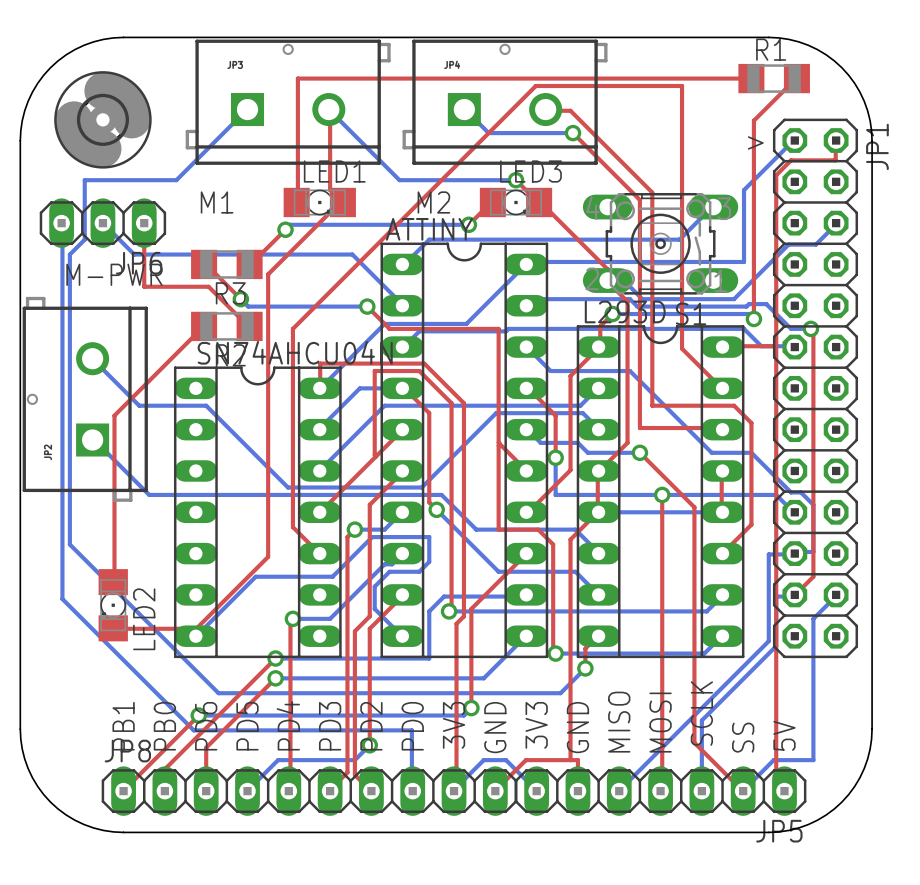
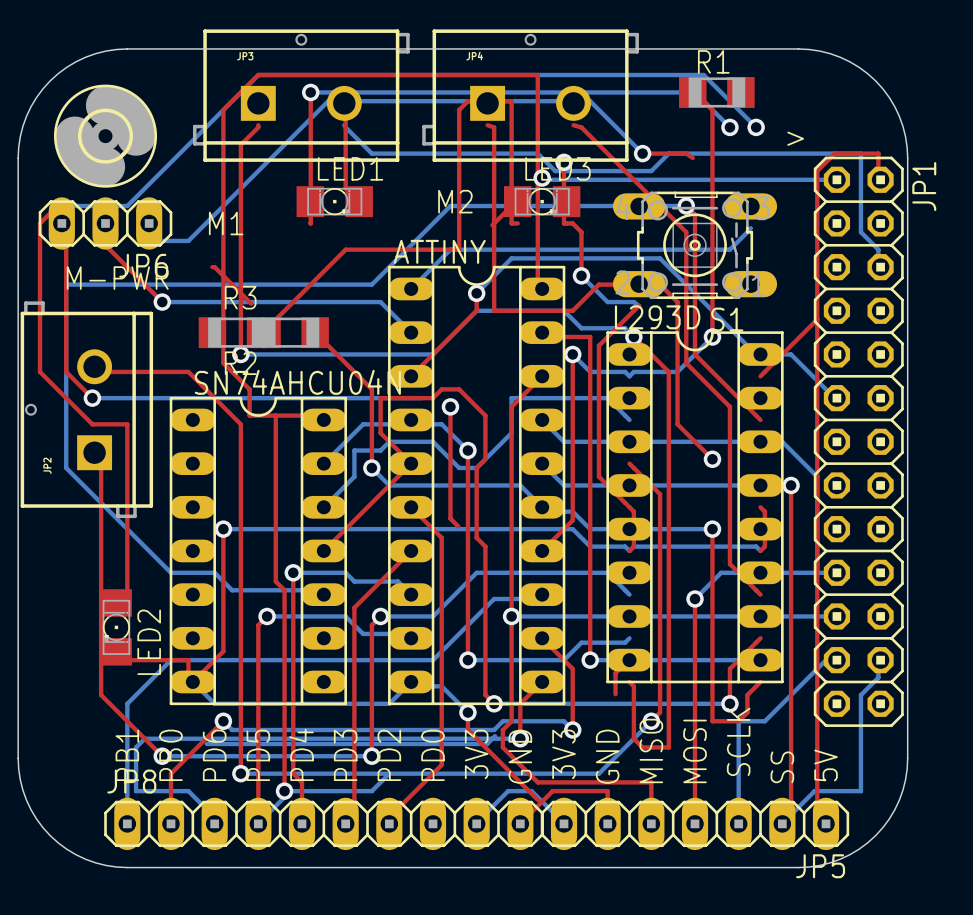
top track: (751, 78) (297, 78) (296, 202) -> none
R1 position: (774, 78) -> (716, 92)
top track: (796, 78) (753, 120) (753, 318) -> none
top track: none -> (310, 92) (310, 223)
bottom track: none -> (310, 92) (695, 92) (729, 127)
via: none -> (310, 92)
top track: none -> (692, 92) (712, 109) (712, 337)
bottom track: (247, 109) (176, 180) (84, 180) (84, 239) (69, 254) (69, 544) (218, 693) (560, 693) (585, 668) -> none
bottom track: (328, 109) (399, 180) (516, 180) -> none
bottom track: (464, 109) (488, 133) (573, 133) -> none
top track: (545, 109) (570, 110) (652, 192) (652, 231) -> (573, 125) (581, 127) (686, 232)
part position: (102, 119) -> (105, 136)
top track: none -> (258, 125) (240, 144) (240, 354)
bottom track: none -> (344, 125) (371, 153) (537, 153) (555, 171) (651, 171) (668, 153) (860, 153) (860, 232) (878, 249) (878, 267) (880, 267)
top track: none -> (487, 125) (494, 127) (494, 310) (572, 310) (598, 284) (660, 284) (677, 302) (677, 424) (712, 459)
via: none -> (729, 127)
bottom track: none -> (756, 127) (703, 75) (258, 75) (127, 206) (57, 206)
via: none -> (756, 127)
top track: (573, 133) (639, 200) (639, 428) (721, 428) (722, 429) -> none
via: (573, 133) -> none
bottom track: (794, 140) (744, 190) (744, 261) (530, 261) (525, 264) (466, 323) (384, 323) (320, 388) -> (92, 398) (334, 398)
top track: (836, 140) (835, 160) (791, 160) (776, 175) -> (880, 179) (878, 179) (878, 153) (834, 153) (817, 172)
top track: none -> (642, 153) (686, 153) (692, 157)
bottom track: none -> (642, 153) (590, 101) (328, 101) (188, 240) (153, 240) (149, 245)
via: none -> (642, 153)
board edge: (20, 161) (20, 130) (24, 110) (32, 92) (43, 75) (58, 60) (74, 49) (93, 41) (113, 37) (768, 37) (788, 39) (808, 45) (826, 54) (841, 67) (854, 83) (864, 101) (870, 120) (872, 140) (871, 739) (867, 759) (859, 777) (848, 794) (834, 808) (817, 820) (798, 827) (778, 831) (758, 832) -> (18, 158) (22, 126) (31, 106) (42, 88) (58, 73) (75, 61) (95, 53) (116, 49) (798, 48) (819, 51) (840, 57) (859, 67) (875, 80) (889, 97) (899, 116) (905, 136) (907, 158) (907, 769) (902, 790) (894, 809) (882, 827) (867, 842) (849, 854) (830, 862) (798, 867)
top track: none -> (564, 162) (564, 223) (572, 223) (581, 232) (581, 275)
via: none -> (564, 162)
top track: (516, 180) (607, 269) (607, 281) (627, 301) (627, 442) (598, 470) (597, 512) (570, 539) (570, 760) -> none
bottom track: none -> (537, 179) (836, 179)
text position: M1 (217, 202) -> M1 (226, 223)
top track: (342, 202) (340, 202) (268, 274) (268, 556) (193, 631) (195, 636) (193, 636) (193, 628) (113, 628) -> none
top track: none -> (57, 206) (40, 223) (40, 371) (92, 424) (127, 424) (127, 602)
top track: none -> (686, 206) (695, 214) (695, 354) (760, 419)
bottom track: none -> (686, 206) (450, 206) (371, 284) (66, 284) (66, 468) (171, 572) (214, 572) (232, 590) (319, 590) (323, 594)
via: none -> (686, 206)
bottom track: (713, 207) (679, 239) (429, 239) (402, 264) -> none
bottom track: (61, 223) (62, 599) (193, 730) (411, 730) (412, 791) -> none
bottom track: (102, 223) (134, 254) (352, 254) (402, 305) -> none
top track: (144, 223) (144, 286) (208, 286) (249, 326) -> none
top track: none -> (517, 223) (511, 223) (511, 101) (467, 101) (459, 109) (459, 249) (345, 249) (267, 328) (267, 332)
bottom track: (836, 223) (815, 244) (788, 244) (734, 299) (642, 299) (625, 281) (607, 280) -> none
bottom track: (468, 224) (290, 224) (285, 229) -> none
via: (468, 224) -> none
bottom track: none -> (750, 228) (729, 249) (450, 249) (411, 288)
top track: (285, 229) (249, 264) -> none
via: (285, 229) -> none
top track: none -> (61, 245) (66, 249) (66, 371) (92, 398)
top track: none -> (105, 245) (162, 302)
R3 position: (226, 264) -> (291, 332)
bottom track: none -> (581, 275) (607, 302) (633, 302) (639, 306)
via: none -> (581, 275)
top track: none -> (542, 288) (537, 284) (537, 75) (258, 75) (223, 109) (223, 363) (249, 389) (249, 415) (319, 415) (323, 419)
top track: none -> (476, 293) (476, 310) (411, 376)
bottom track: none -> (476, 293) (511, 258) (660, 258) (756, 354) (791, 354) (834, 398) (836, 398)
via: none -> (476, 293)
bottom track: none -> (162, 302) (380, 302) (411, 332)
via: none -> (162, 302)
bottom track: (240, 299) (248, 306) (367, 306) -> none
via: (240, 299) -> none
top track: none -> (639, 306) (598, 345) (598, 476) (633, 511) (633, 546) (629, 550)
bottom track: (526, 305) (533, 299) (630, 299) (637, 306) (746, 306) (748, 304) (766, 304) (791, 328) (810, 328) -> none
top track: (367, 306) (389, 328) (498, 328) (498, 442) (526, 470) -> none
via: (367, 306) -> none
top track: (612, 314) (600, 326) (600, 346) (570, 375) (570, 470) (526, 512) -> none
bottom track: (612, 314) (748, 314) (753, 318) -> none
via position: (612, 314) -> (633, 337)
top track: none -> (817, 319) (760, 376)
via: (753, 318) -> none
top track: (204, 326) (114, 415) (113, 582) -> none
top track: none -> (315, 332) (371, 389) (371, 468)
top track: none -> (542, 332) (546, 337) (590, 337) (590, 660)
top track: (810, 328) (813, 331) (813, 576) (794, 594) -> none
via: (810, 328) -> none
top track: none -> (633, 337) (668, 371) (668, 747) (642, 747) (633, 738) (633, 686) (629, 681)
bottom track: none -> (633, 337) (625, 328) (581, 328) (564, 310) (476, 310) (433, 354) (240, 354)
bottom track: none -> (712, 337) (677, 371) (633, 371) (629, 376) (625, 371) (590, 371) (572, 354)
via: none -> (712, 337)
top track: (776, 346) (722, 347) -> none
via: none -> (240, 354)
bottom track: (402, 347) (419, 331) (506, 331) (508, 328) (744, 328) (761, 346) (794, 347) -> none
bottom track: (526, 347) (550, 371) (630, 371) (711, 452) (751, 452) (791, 492) (801, 492) (813, 504) (813, 551) (768, 554) (768, 641) (619, 791) -> none
top track: none -> (572, 354) (572, 520) (542, 550)
via: none -> (572, 354)
top track: (652, 355) (652, 405) (734, 405) (751, 423) (751, 470) -> (686, 363) (729, 406) (729, 564) (760, 594)
top track: none -> (94, 366) (101, 371) (188, 371) (240, 424) (240, 773)
bottom track: (92, 358) (139, 405) (206, 405) (287, 487) (421, 487) (496, 413) (582, 413) (598, 429) -> none
top track: none -> (542, 376) (511, 406) (511, 721) (502, 730) (502, 747) (537, 782) (651, 782) (651, 823)
via: none -> (92, 398)
top track: (319, 388) (320, 363) (424, 363) (463, 403) (463, 616) (456, 623) (456, 787) (454, 791) -> none
bottom track: (359, 388) (319, 429) -> (377, 398) (335, 398)
top track: none -> (422, 398) (380, 398) (380, 433) (411, 463) (323, 550)
top track: (404, 388) (429, 413) -> (450, 406) (450, 424)
top track: none -> (424, 398) (433, 398) (441, 389) (459, 389) (485, 415) (485, 459) (476, 468) (476, 537) (485, 546) (485, 695) (494, 703)
top track: (526, 388) (555, 415) (555, 457) -> none
bottom track: (598, 388) (580, 405) (384, 405) (319, 470) -> none
top track: (722, 388) (682, 348) (682, 86) (535, 86) (292, 328) (292, 527) (319, 553) -> none
JP1 position: (815, 388) -> (858, 441)
via: none -> (450, 406)
top track: none -> (275, 415) (275, 581) (284, 590) (284, 791)
bottom track: none -> (542, 419) (564, 441) (782, 441) (817, 476) (817, 572)
bottom track: none -> (629, 419) (607, 398) (511, 398) (511, 433) (476, 468) (459, 468) (433, 441) (389, 441) (380, 450) (354, 450) (354, 476) (323, 507)
top track: (402, 429) (319, 512) -> none
bottom track: (526, 429) (540, 442) (577, 442) (587, 452) (639, 452) -> none
top track: none -> (467, 450) (467, 660)
bottom track: none -> (467, 450) (441, 424) (415, 424) (411, 419) (406, 424) (363, 424) (323, 463)
via: none -> (467, 450)
top track: none -> (94, 452) (101, 459) (101, 695) (162, 756)
bottom track: (92, 440) (149, 494) (441, 494) (476, 529) (575, 529) (598, 553) -> none
top track: (499, 444) (498, 529) (538, 529) (553, 544) (553, 651) (555, 653) -> none
via: none -> (712, 459)
ATTINY position: (464, 450) -> (476, 485)
bottom track: none -> (542, 463) (564, 485) (791, 485)
top track: none -> (629, 463) (660, 494) (660, 712) (651, 721)
top track: (639, 452) (694, 507) (694, 742) (743, 791) -> (791, 542) (791, 808) (782, 817) (782, 823)
via: (639, 452) -> none
bottom track: none -> (371, 468) (389, 485) (520, 485) (546, 511) (572, 511) (590, 529) (629, 529)
via: none -> (371, 468)
top track: (375, 456) (374, 371) (419, 371) (451, 403) (451, 608) (449, 611) -> none
bottom track: (555, 457) (555, 494) (776, 494) (794, 512) -> none
via: (555, 457) -> none
top track: (402, 470) (369, 504) (369, 616) (354, 631) -> (380, 616) (371, 625) (371, 654)
top track: (722, 470) (722, 512) -> none
via: none -> (791, 485)
top track: none -> (760, 507) (764, 511) (764, 546) (760, 550)
top track: (662, 494) (662, 789) (660, 791) -> (695, 599) (695, 823)
via position: (662, 494) -> (712, 529)
bottom track: (436, 509) (498, 571) (575, 571) (598, 594) -> none
via: (436, 509) -> none
top track: none -> (223, 529) (223, 651) (192, 681) (188, 677) (188, 660) (127, 660) (127, 651)
via: none -> (223, 529)
SN74AHCU04N position: (257, 512) -> (258, 550)
bottom track: (401, 512) (384, 529) (354, 529) -> (421, 529) (223, 529)
bottom track: none -> (422, 529) (572, 529) (590, 546) (625, 546) (629, 550) (633, 546) (756, 546) (760, 550)
top track: none -> (712, 529) (712, 721) (738, 721) (747, 712) (747, 695) (760, 681)
bottom track: (677, 512) (722, 512) -> none
top track: (751, 524) (722, 553) -> none
top track: (354, 529) (347, 537) (347, 772) (330, 789) -> (411, 550) (354, 607) (354, 808) (345, 817) (345, 822)
via: (354, 529) -> none
bottom track: none -> (293, 572) (345, 572) (354, 581) (398, 581) (411, 594)
via: none -> (293, 572)
bottom track: (402, 553) (392, 564) (384, 564) (330, 618) (292, 618) -> none
top track: (526, 553) (471, 608) (471, 708) -> none
bottom track: none -> (836, 572) (721, 572) (695, 599)
bottom track: none -> (542, 594) (537, 599) (494, 599) (433, 660) (422, 660)
bottom track: none -> (629, 594) (607, 572) (476, 572) (433, 616) (380, 616)
via: none -> (695, 599)
top track: none -> (267, 616) (258, 625) (258, 823)
bottom track: none -> (267, 616) (345, 616) (363, 633) (406, 633) (411, 638)
via: none -> (267, 616)
via: none -> (380, 616)
top track: (402, 594) (369, 628) (369, 745) -> none
bottom track: none -> (511, 616) (836, 616)
via: none -> (511, 616)
bottom track: (526, 594) (525, 596) (444, 596) (429, 611) (429, 658) (275, 658) -> none
bottom track: (722, 594) (706, 611) (449, 611) -> none
bottom track: (794, 594) (793, 596) (776, 596) (776, 646) (701, 720) -> (826, 660) (764, 721) (738, 721) (738, 749)
bottom track: (836, 594) (813, 618) (813, 760) -> (880, 660) (878, 660) (878, 677) (860, 695) (860, 791) (856, 791)
via: (449, 611) -> none
top track: none -> (542, 638) (572, 668) (572, 730)
bottom track: none -> (629, 638) (625, 642) (581, 642) (564, 660) (553, 660)
top track: none -> (760, 638) (729, 668) (729, 703)
top track: (292, 618) (290, 621) (290, 789) (288, 791) -> (293, 572) (293, 773) (302, 782) (302, 823)
via: (292, 618) -> none
bottom track: none -> (203, 660) (171, 660) (127, 703) (127, 823)
bottom track: (196, 636) (255, 576) (332, 576) (372, 537) (429, 537) (429, 561) (419, 571) (389, 571) (374, 586) (374, 608) (401, 636) -> (204, 660) (421, 660)
via: none -> (467, 660)
bottom track: (525, 636) (483, 678) (275, 678) -> (552, 660) (467, 660)
bottom track: (721, 636) (704, 653) (555, 653) -> (759, 660) (590, 660)
via position: (555, 653) -> (590, 660)
bottom track: none -> (192, 681) (214, 703) (389, 703) (411, 681) (415, 686) (441, 686) (467, 712)
top track: none -> (542, 681) (520, 703) (520, 738)
top track: (275, 658) (166, 767) (166, 789) (164, 791) -> (223, 721) (171, 773) (171, 823)
via: (275, 658) -> none
via: (585, 668) -> none
bottom track: none -> (494, 703) (729, 703)
via: none -> (494, 703)
via: none -> (729, 703)
top track: (275, 678) (206, 747) (206, 791) -> none
via: (275, 678) -> none
top track: none -> (467, 712) (467, 730) (537, 799)
via: none -> (467, 712)
bottom track: none -> (223, 721) (232, 730) (494, 730) (502, 721) (564, 721) (572, 730)
via: none -> (223, 721)
bottom track: none -> (651, 721) (598, 773) (240, 773)
via: none -> (651, 721)
via: none -> (572, 730)
via: (471, 708) -> none
bottom track: none -> (520, 738) (144, 738) (136, 747) (136, 791) (188, 791) (214, 817) (214, 823)
via: none -> (520, 738)
top track: (198, 715) (123, 791) -> none
via: (198, 715) -> none
bottom track: none -> (162, 756) (371, 756)
via: none -> (162, 756)
top track: (354, 727) (354, 775) (371, 791) -> (411, 507) (441, 537) (441, 764) (389, 817) (389, 823)
via: none -> (240, 773)
via position: (369, 745) -> (371, 756)
via: none -> (284, 791)

